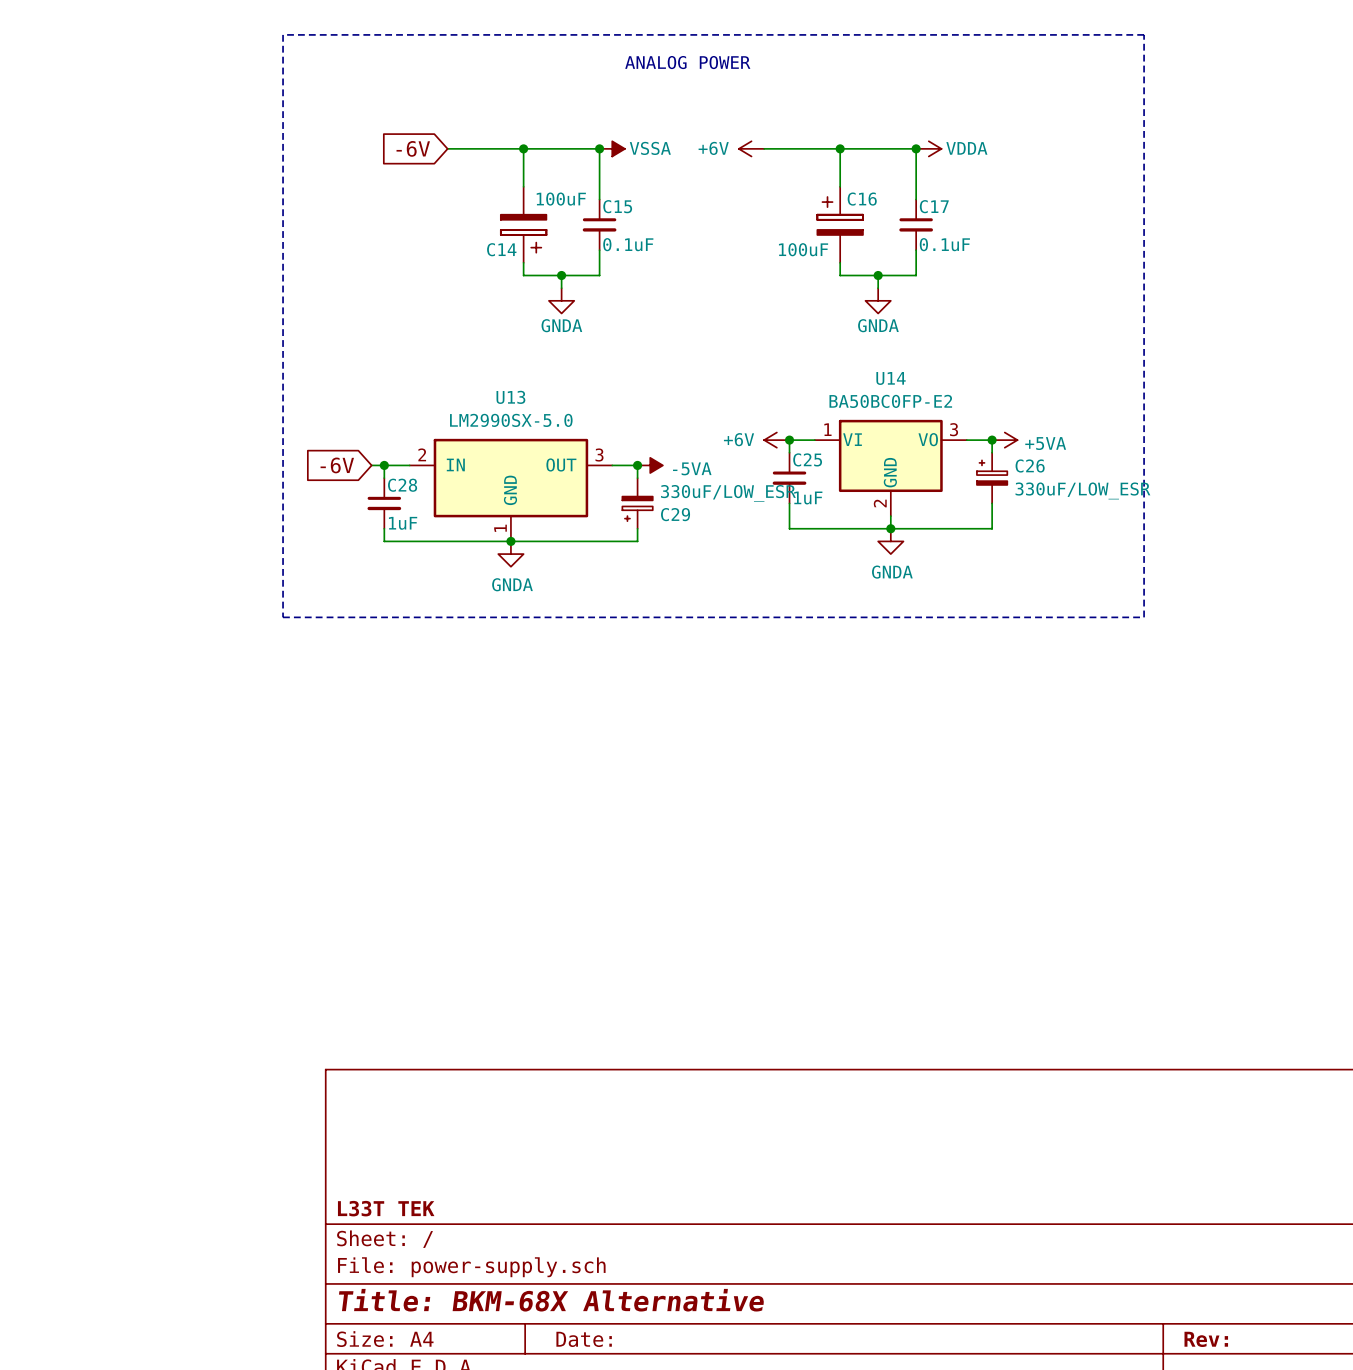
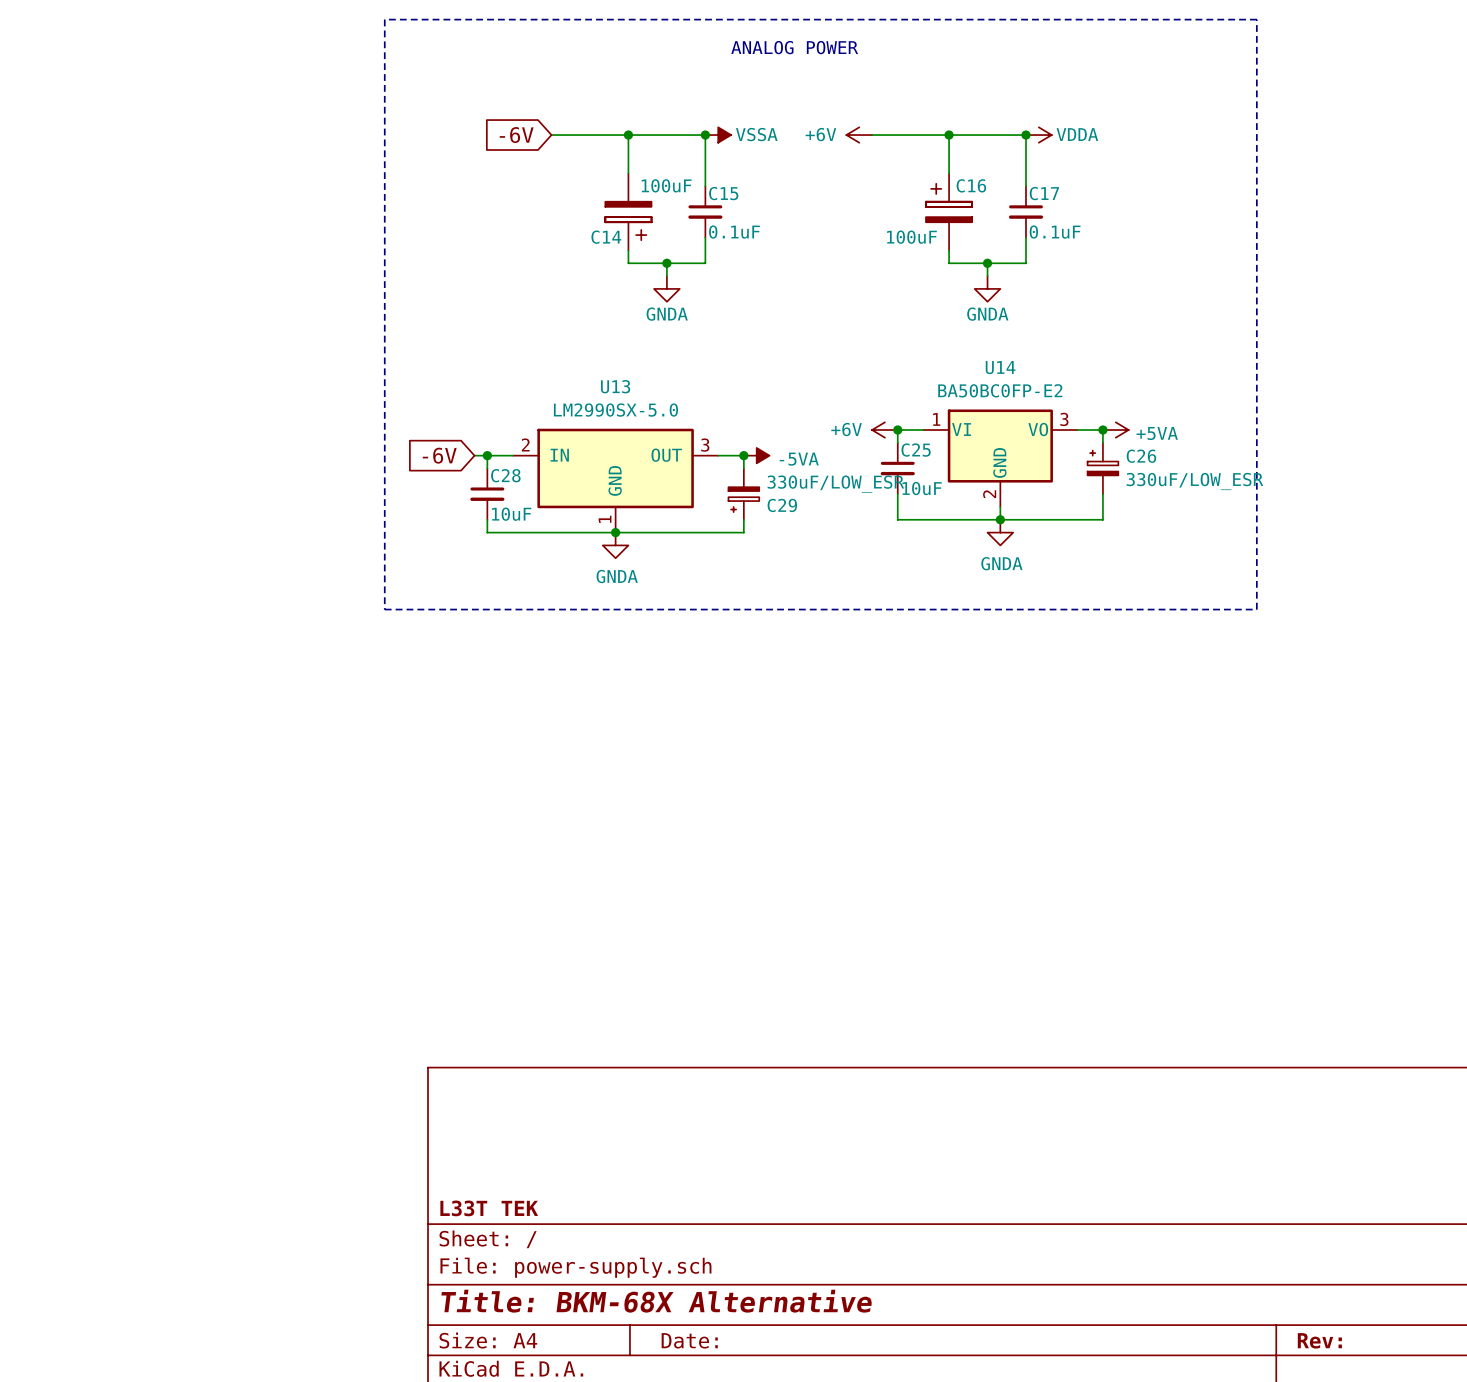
C25 value: 1uF (808, 498) -> 10uF (922, 488)
C28 value: 1uF (403, 523) -> 10uF (511, 514)

